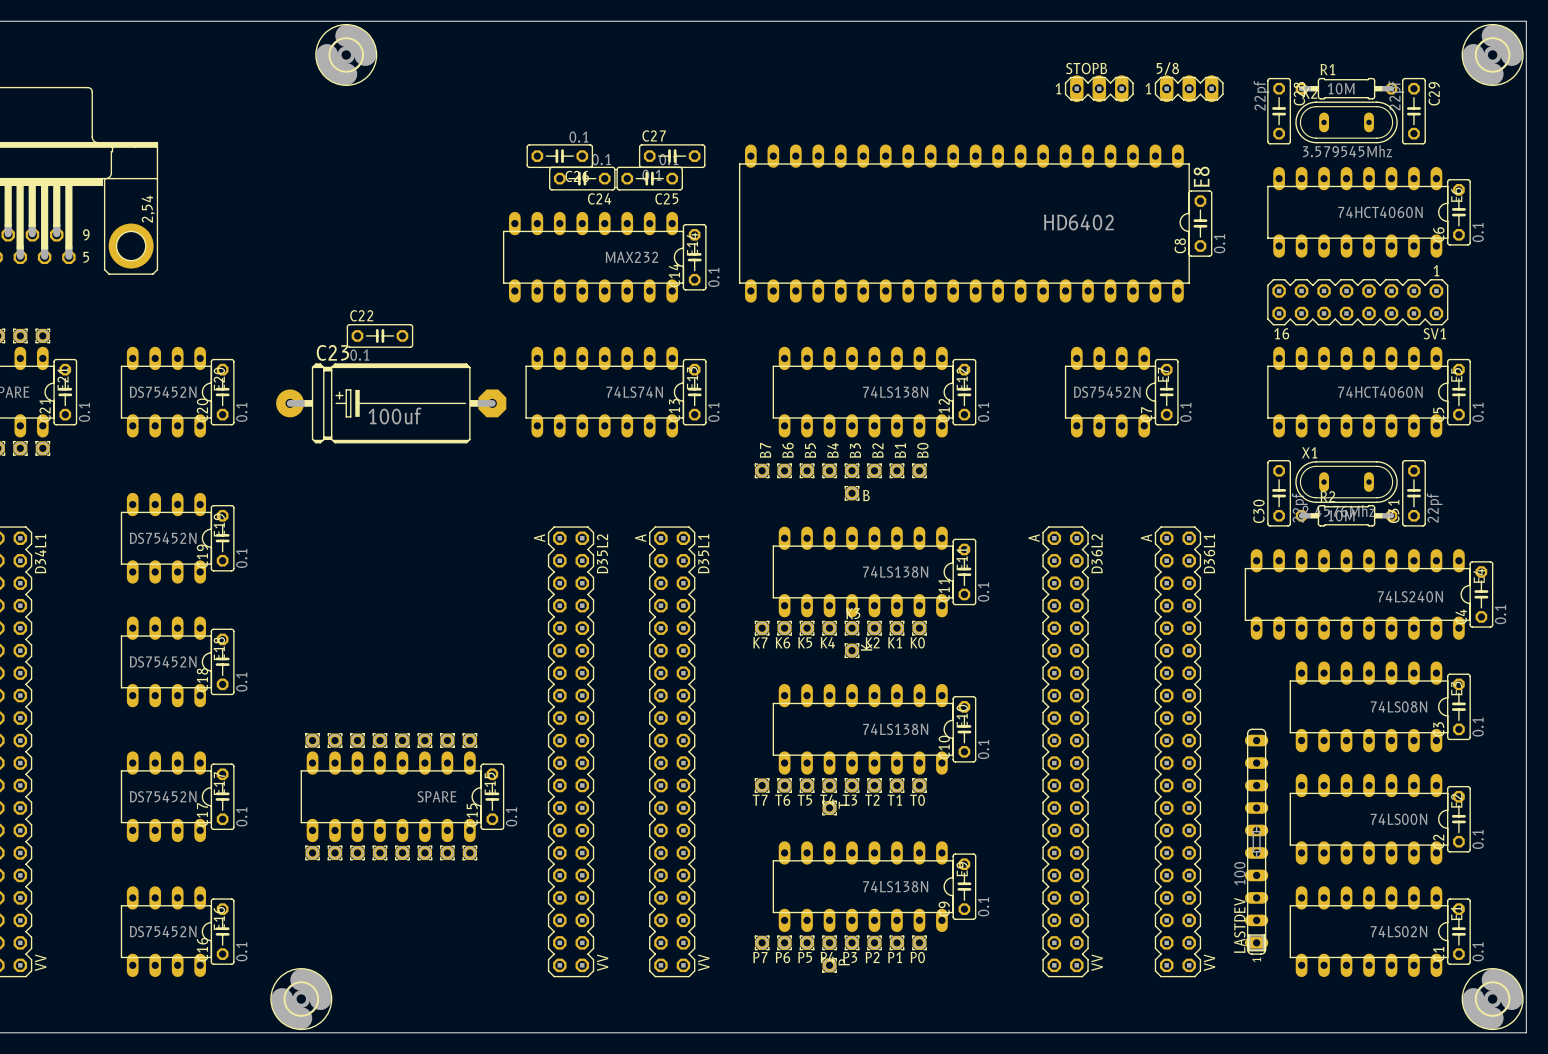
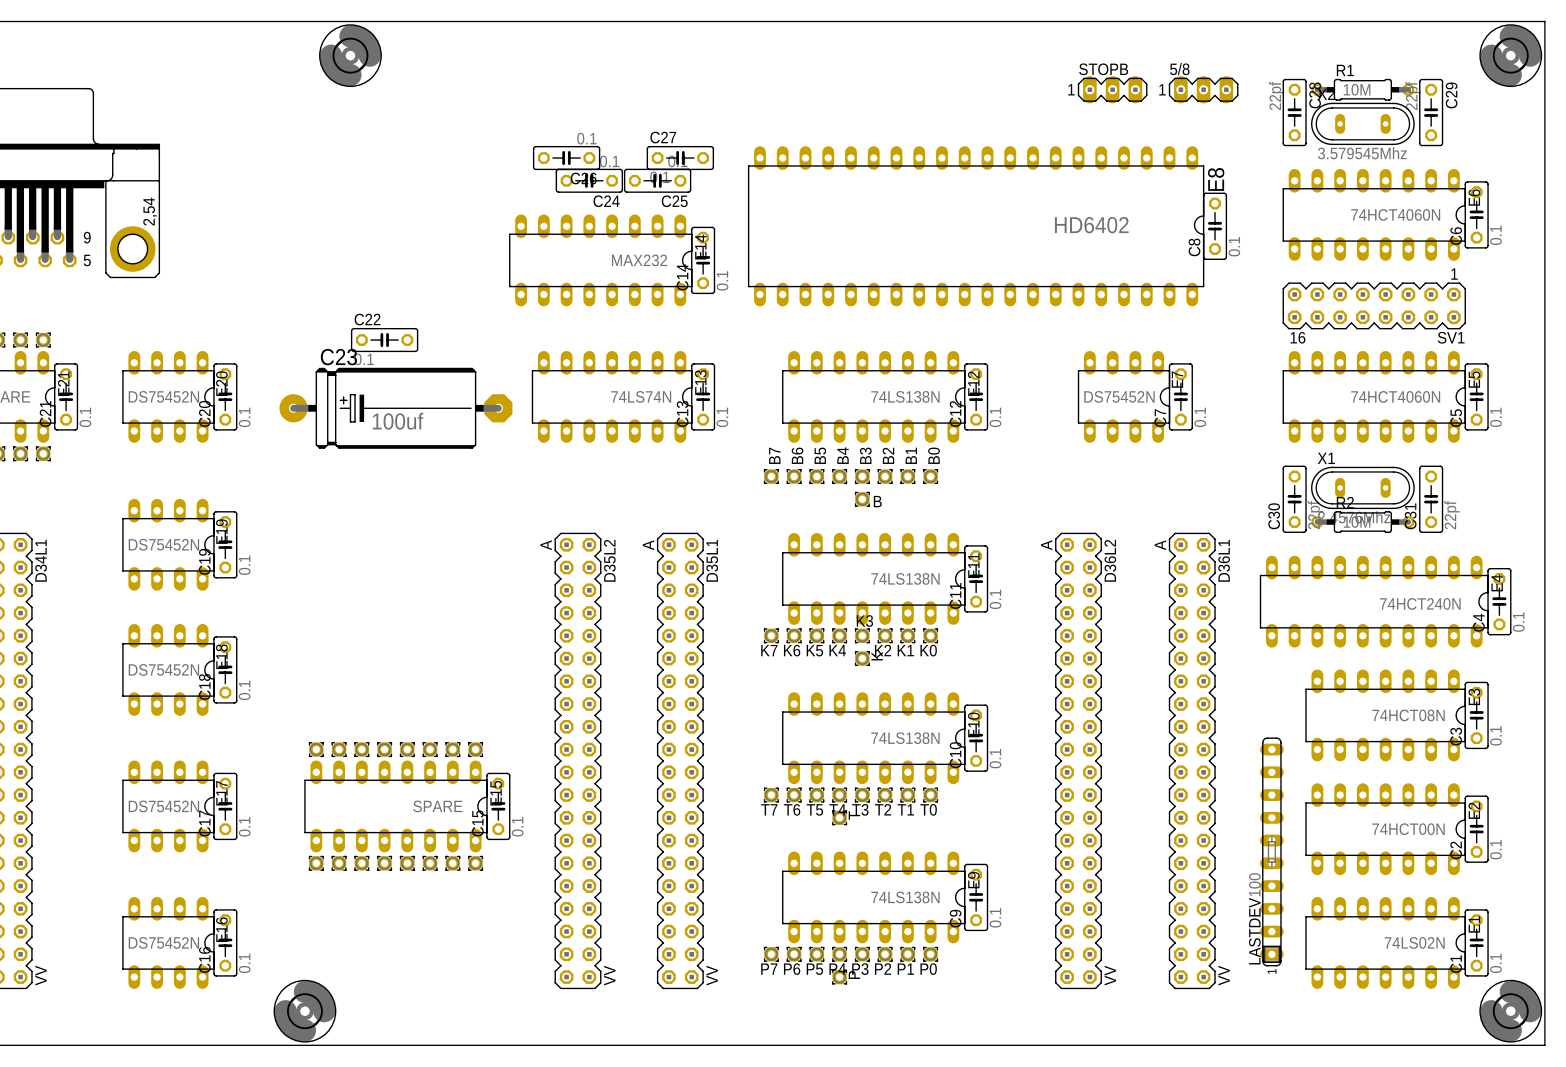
E4 value: 74LS240N (1410, 596) -> 74HCT240N (1420, 603)
E3 value: 74LS08N (1398, 706) -> 74HCT08N (1408, 715)
E2 value: 74LS00N (1398, 819) -> 74HCT00N (1408, 829)

